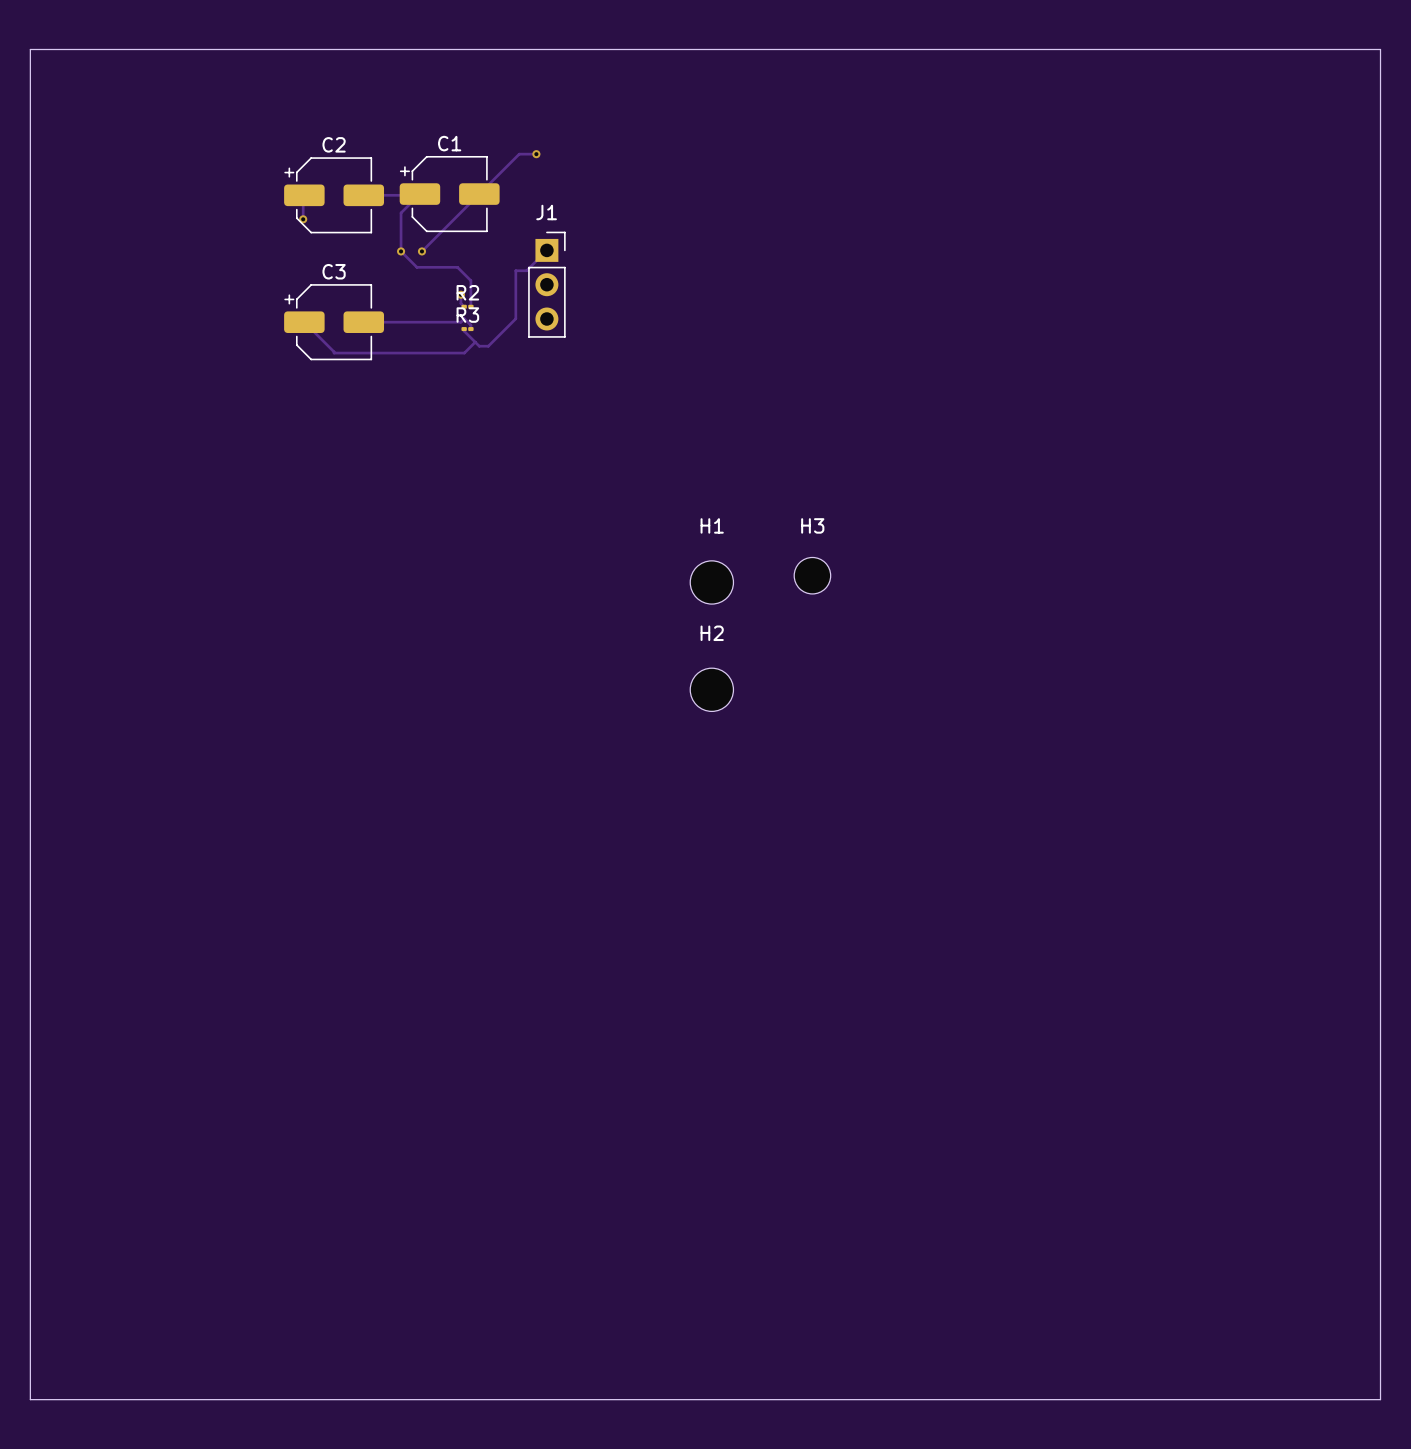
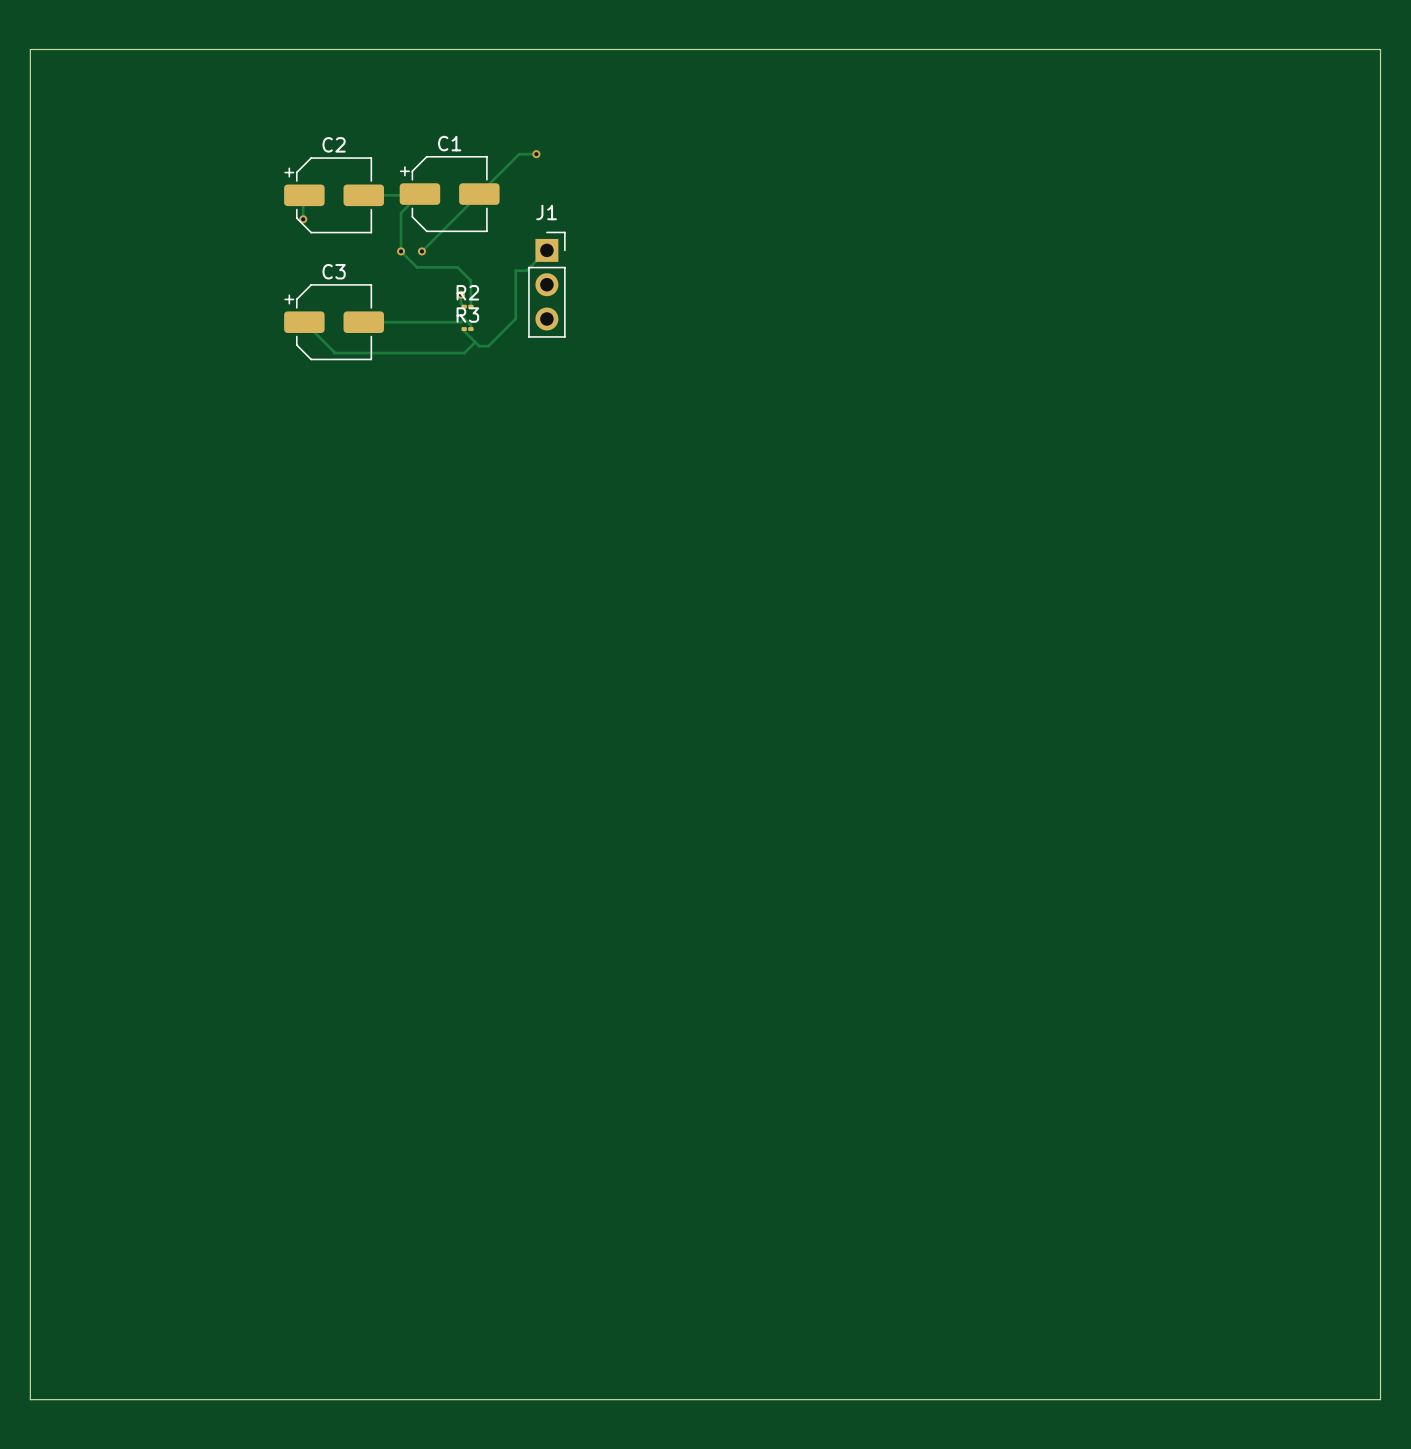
H3: (812, 575) -> none
H1: (711, 582) -> none
H2: (711, 689) -> none

